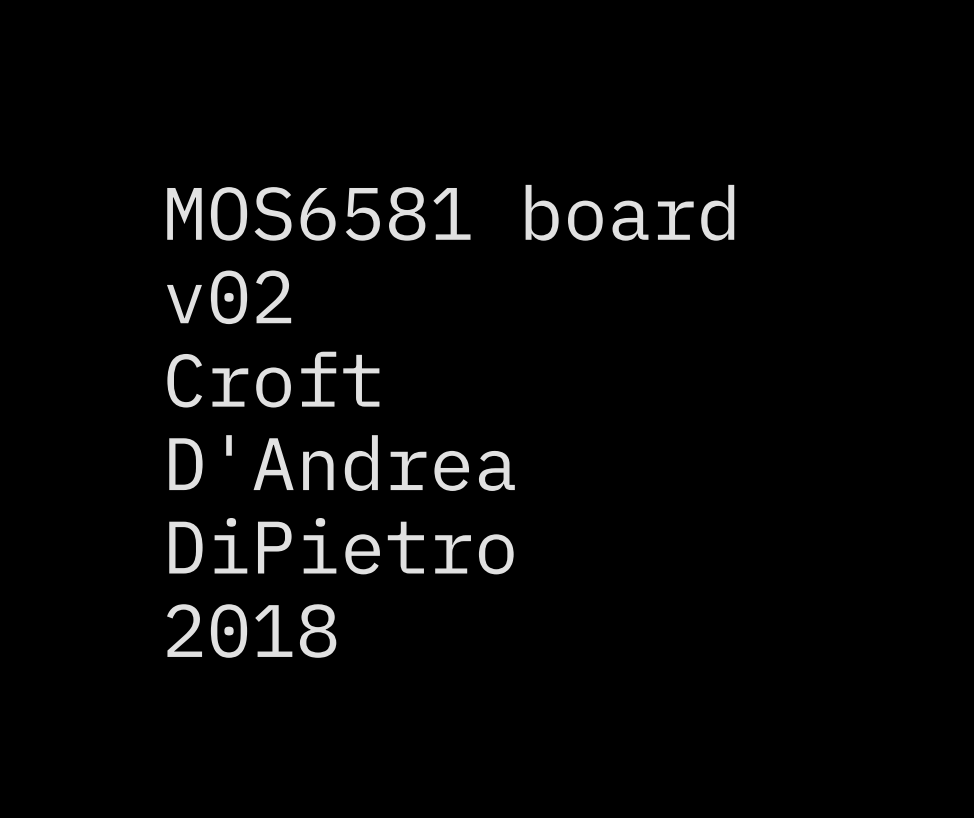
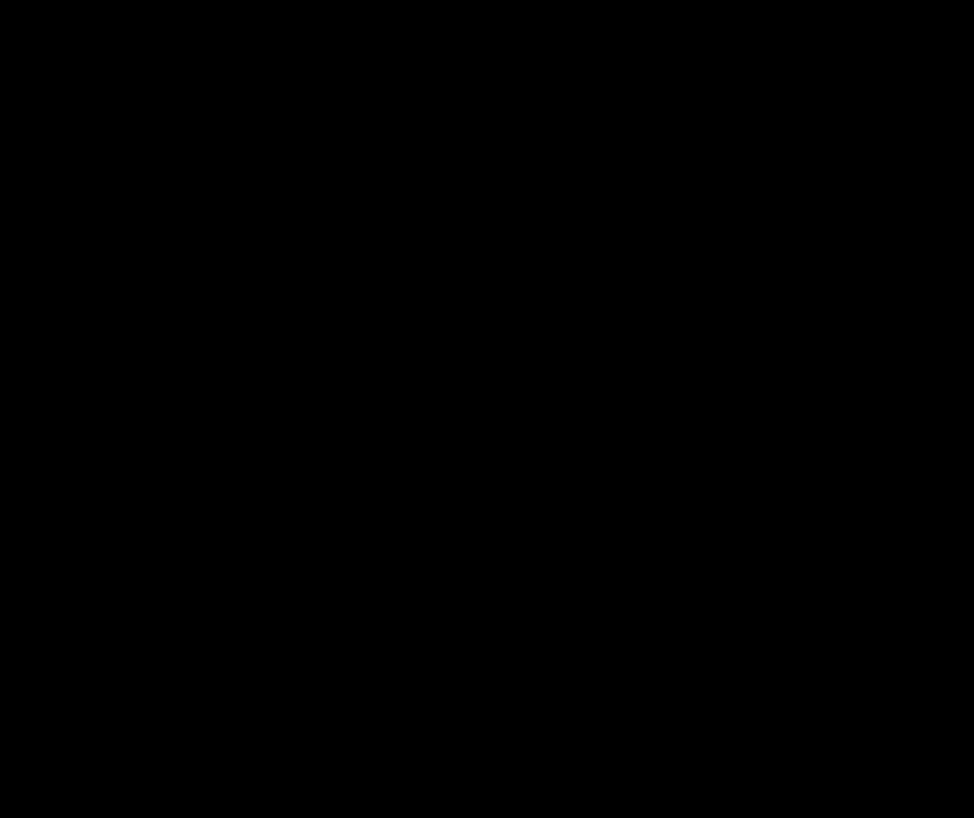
text: MOS6581 board (450, 212) -> none
text: v02 (229, 297) -> none
text: Croft (273, 379) -> none
text: D'Andrea (342, 463) -> none
text: DiPietro (341, 546) -> none
text: 2018 (251, 631) -> none

